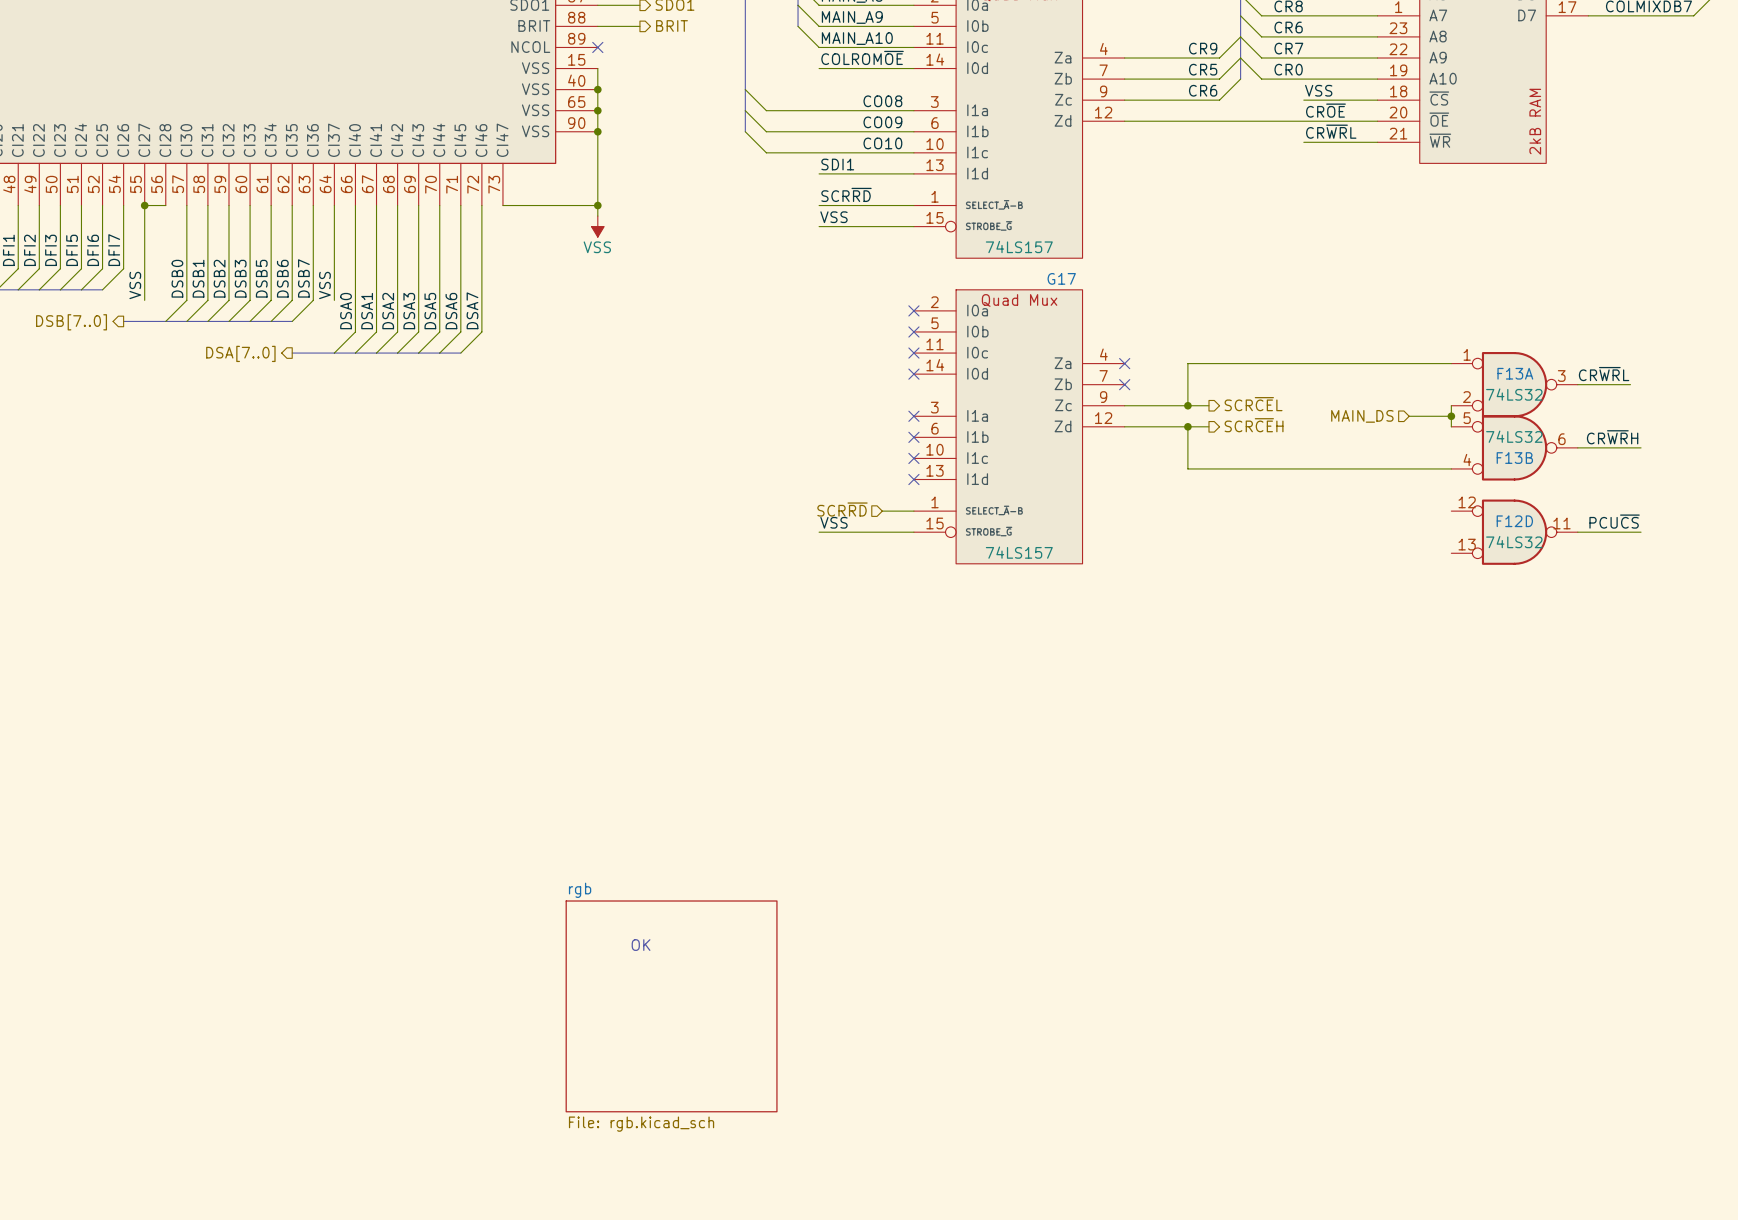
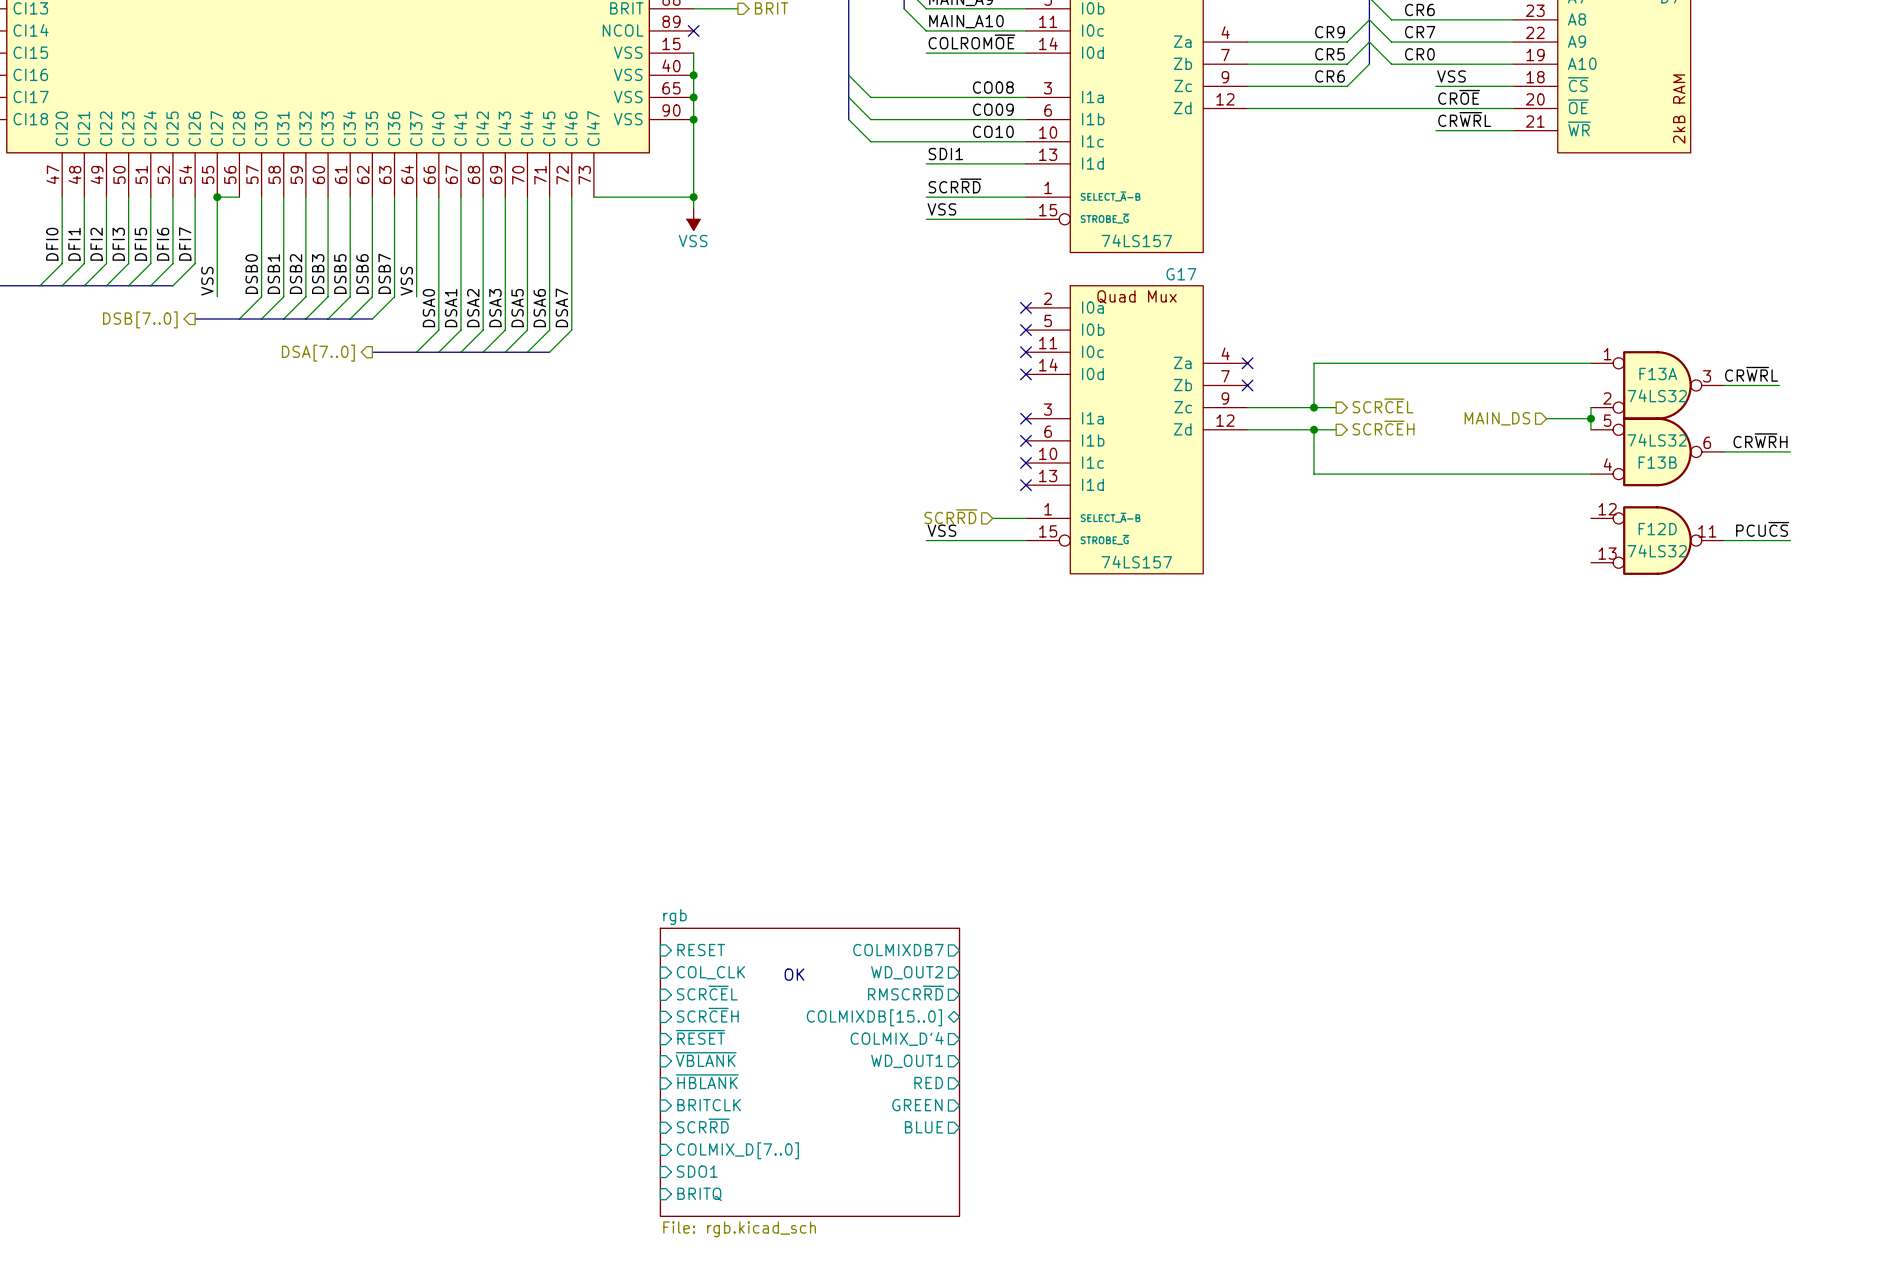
sheet pin: none -> RESET (701, 950)
sheet pin: none -> COLMIXDB7 (898, 950)
sheet pin: none -> COL_CLK (710, 972)
sheet pin: none -> WD_OUT2 (907, 972)
text position: OK (641, 945) -> OK (794, 974)
sheet pin: none -> SCR~{CE}L (707, 993)
sheet pin: none -> RMSCR~{RD} (906, 993)
sheet pin: none -> SCR~{CE}H (707, 1015)
sheet pin: none -> COLMIXDB[15..0] (874, 1017)
sheet pin: none -> ~{RESET} (700, 1037)
sheet rgb: File: rgb.kicad_sch (671, 1006) -> none
sheet pin: none -> COLMIX_D'4 (897, 1038)
sheet pin: none -> ~{VBLANK} (706, 1059)
sheet pin: none -> WD_OUT1 (907, 1061)
sheet rgb: none -> File: rgb.kicad_sch (809, 1072)
sheet pin: none -> ~{HBLANK} (707, 1081)
sheet pin: none -> RED (928, 1082)
sheet pin: none -> BRITCLK (709, 1105)
sheet pin: none -> GREEN (917, 1105)
sheet pin: none -> SCR~{RD} (703, 1126)
sheet pin: none -> BLUE (923, 1127)
sheet pin: none -> COLMIX_D[7..0] (737, 1150)
sheet pin: none -> SDO1 (697, 1171)
sheet pin: none -> BRITQ (699, 1194)

